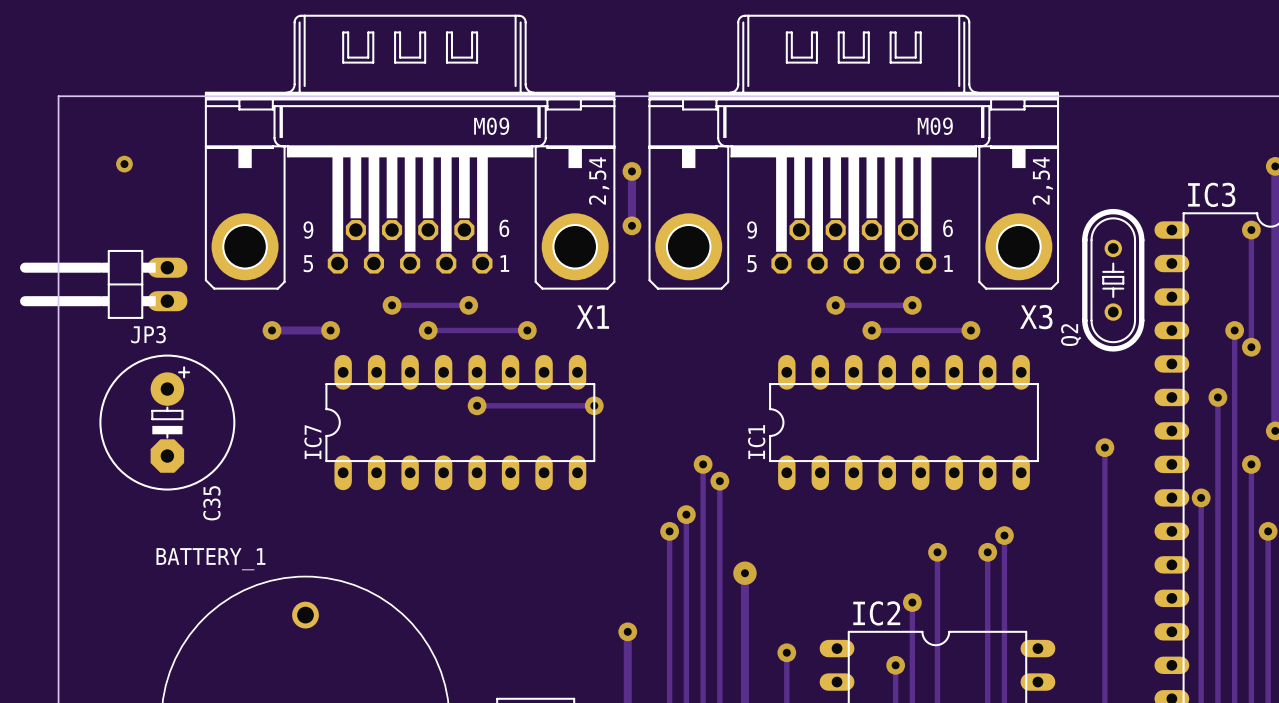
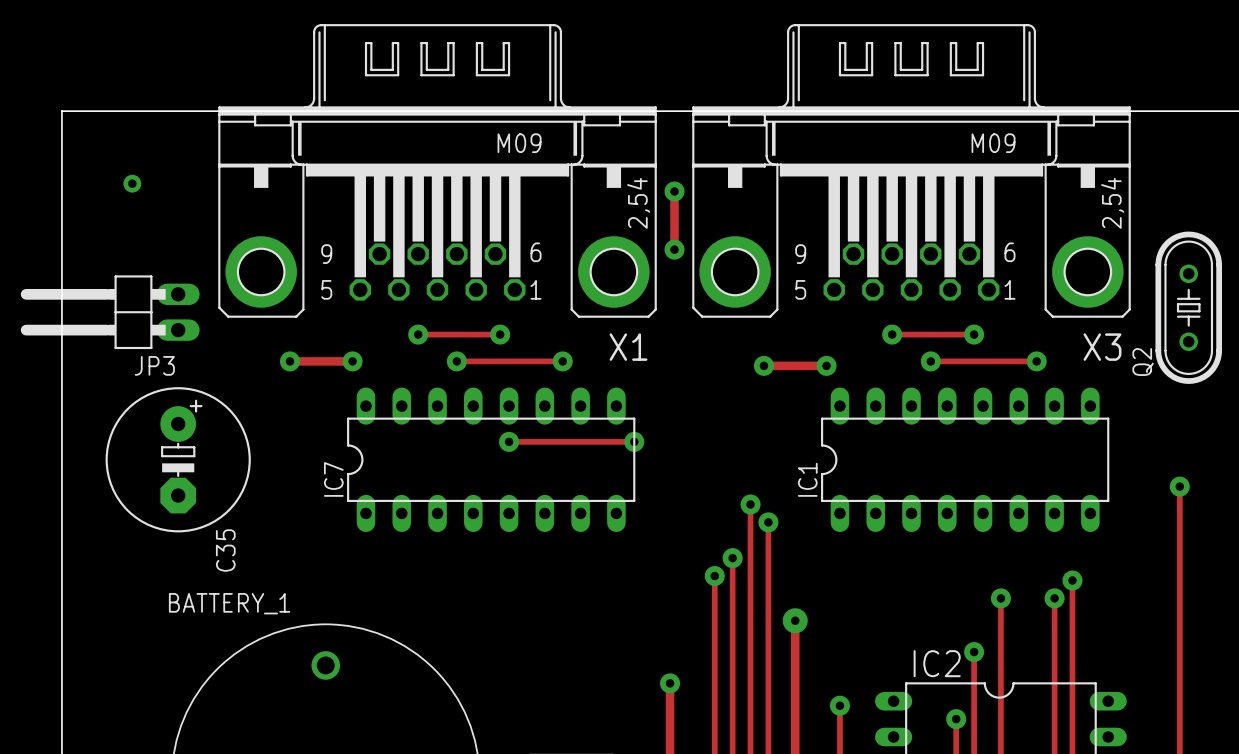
track: none -> (763, 365) (826, 365)
via: none -> (763, 365)
via: none -> (826, 365)

